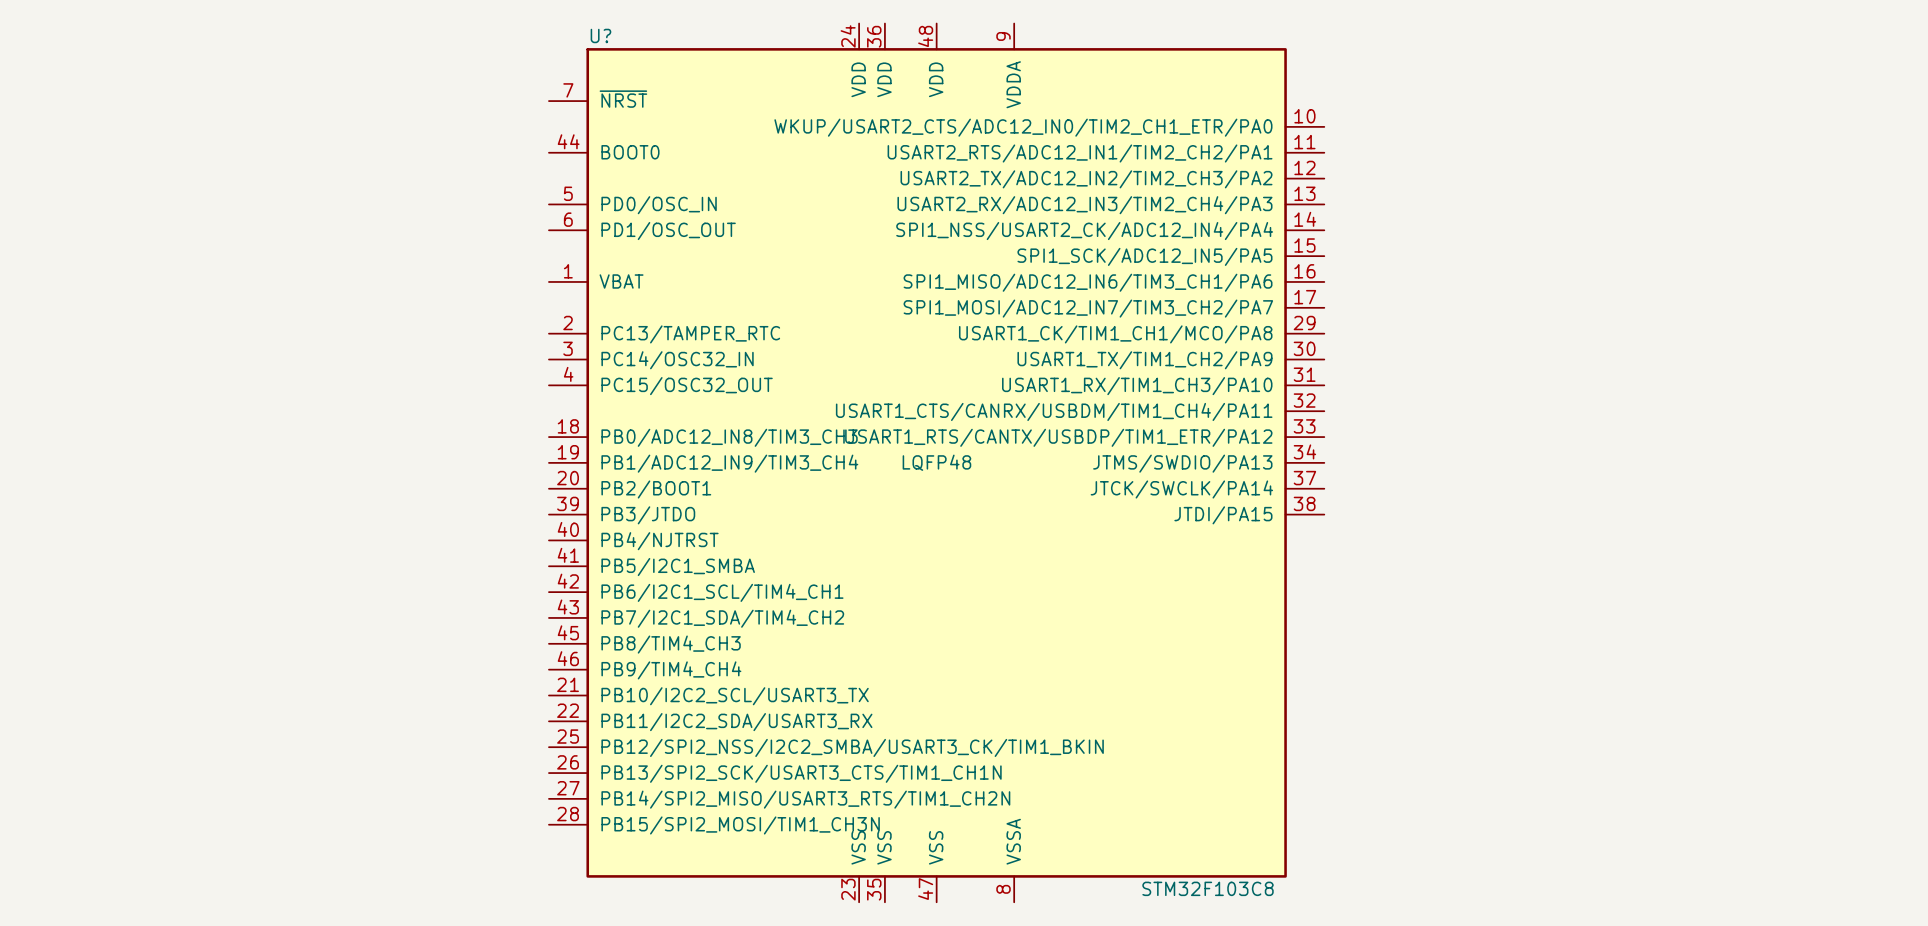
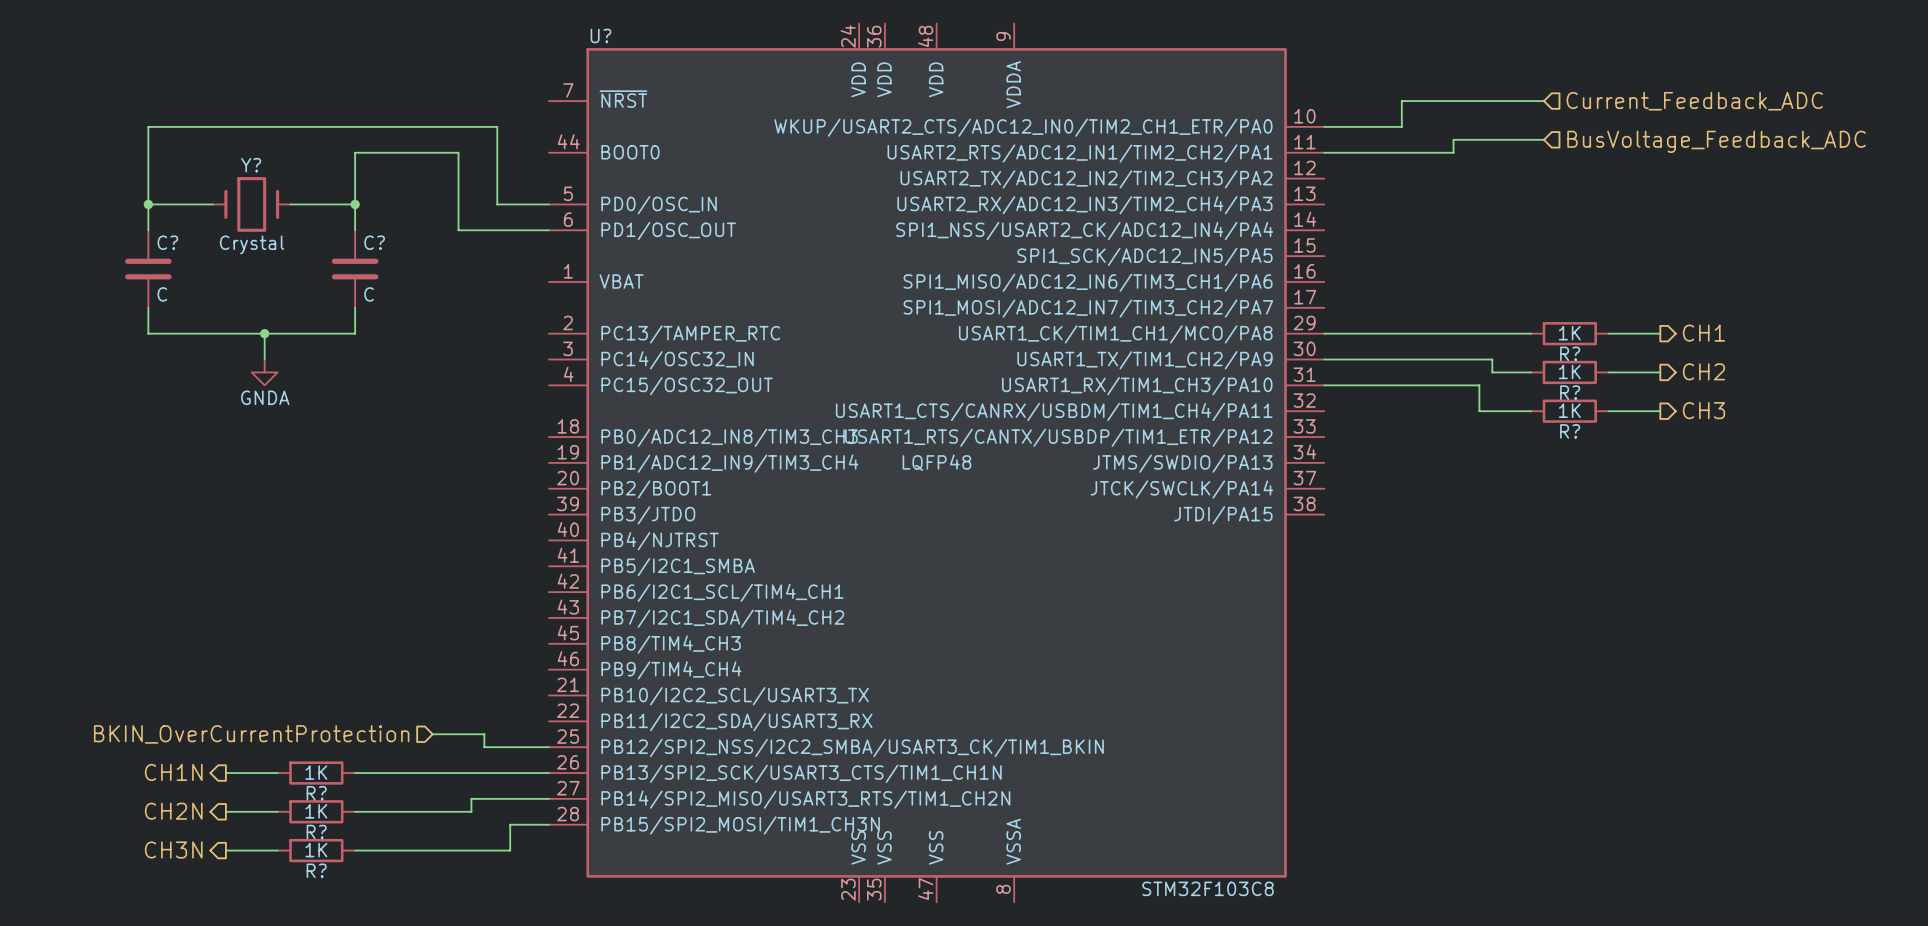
wire: none -> (1543, 101) (1401, 101) (1401, 126) (1324, 126)
hierarchical label: none -> Current_Feedback_ADC (1694, 101)
wire: none -> (1543, 139) (1453, 139) (1453, 152) (1324, 152)
hierarchical label: none -> BusVoltage_Feedback_ADC (1716, 141)
wire: none -> (148, 204) (212, 204)
junction: none -> (148, 204)
Y?: none -> Crystal (251, 204)
wire: none -> (290, 204) (355, 204)
junction: none -> (355, 204)
wire: none -> (548, 204) (497, 204) (497, 126) (148, 126) (148, 230)
wire: none -> (355, 230) (355, 152) (458, 152) (458, 230) (548, 230)
C?: none -> C (148, 269)
C?: none -> C (355, 269)
wire: none -> (148, 307) (148, 333) (355, 333) (355, 307)
wire: none -> (264, 333) (264, 359)
junction: none -> (264, 333)
wire: none -> (1324, 333) (1531, 333)
R?: none -> 1K (1569, 333)
wire: none -> (1608, 333) (1660, 333)
hierarchical label: none -> CH1 (1703, 333)
wire: none -> (1324, 359) (1492, 359) (1492, 372) (1531, 372)
hierarchical label: none -> CH2 (1703, 371)
power symbol: none -> GNDA (264, 372)
R?: none -> 1K (1569, 372)
wire: none -> (1608, 372) (1660, 372)
wire: none -> (1324, 385) (1479, 385) (1479, 411) (1531, 411)
hierarchical label: none -> CH3 (1703, 410)
R?: none -> 1K (1569, 411)
wire: none -> (1608, 411) (1660, 411)
hierarchical label: none -> BKIN_OverCurrentProtection (251, 734)
wire: none -> (432, 734) (484, 734) (484, 747) (548, 747)
hierarchical label: none -> CH1N (173, 772)
wire: none -> (225, 773) (277, 773)
R?: none -> 1K (316, 773)
wire: none -> (355, 773) (548, 773)
wire: none -> (548, 798) (471, 798) (471, 811) (355, 811)
hierarchical label: none -> CH2N (173, 811)
wire: none -> (225, 811) (277, 811)
R?: none -> 1K (316, 811)
wire: none -> (548, 824) (510, 824) (510, 850) (355, 850)
hierarchical label: none -> CH3N (173, 849)
wire: none -> (225, 850) (277, 850)
R?: none -> 1K (316, 850)

